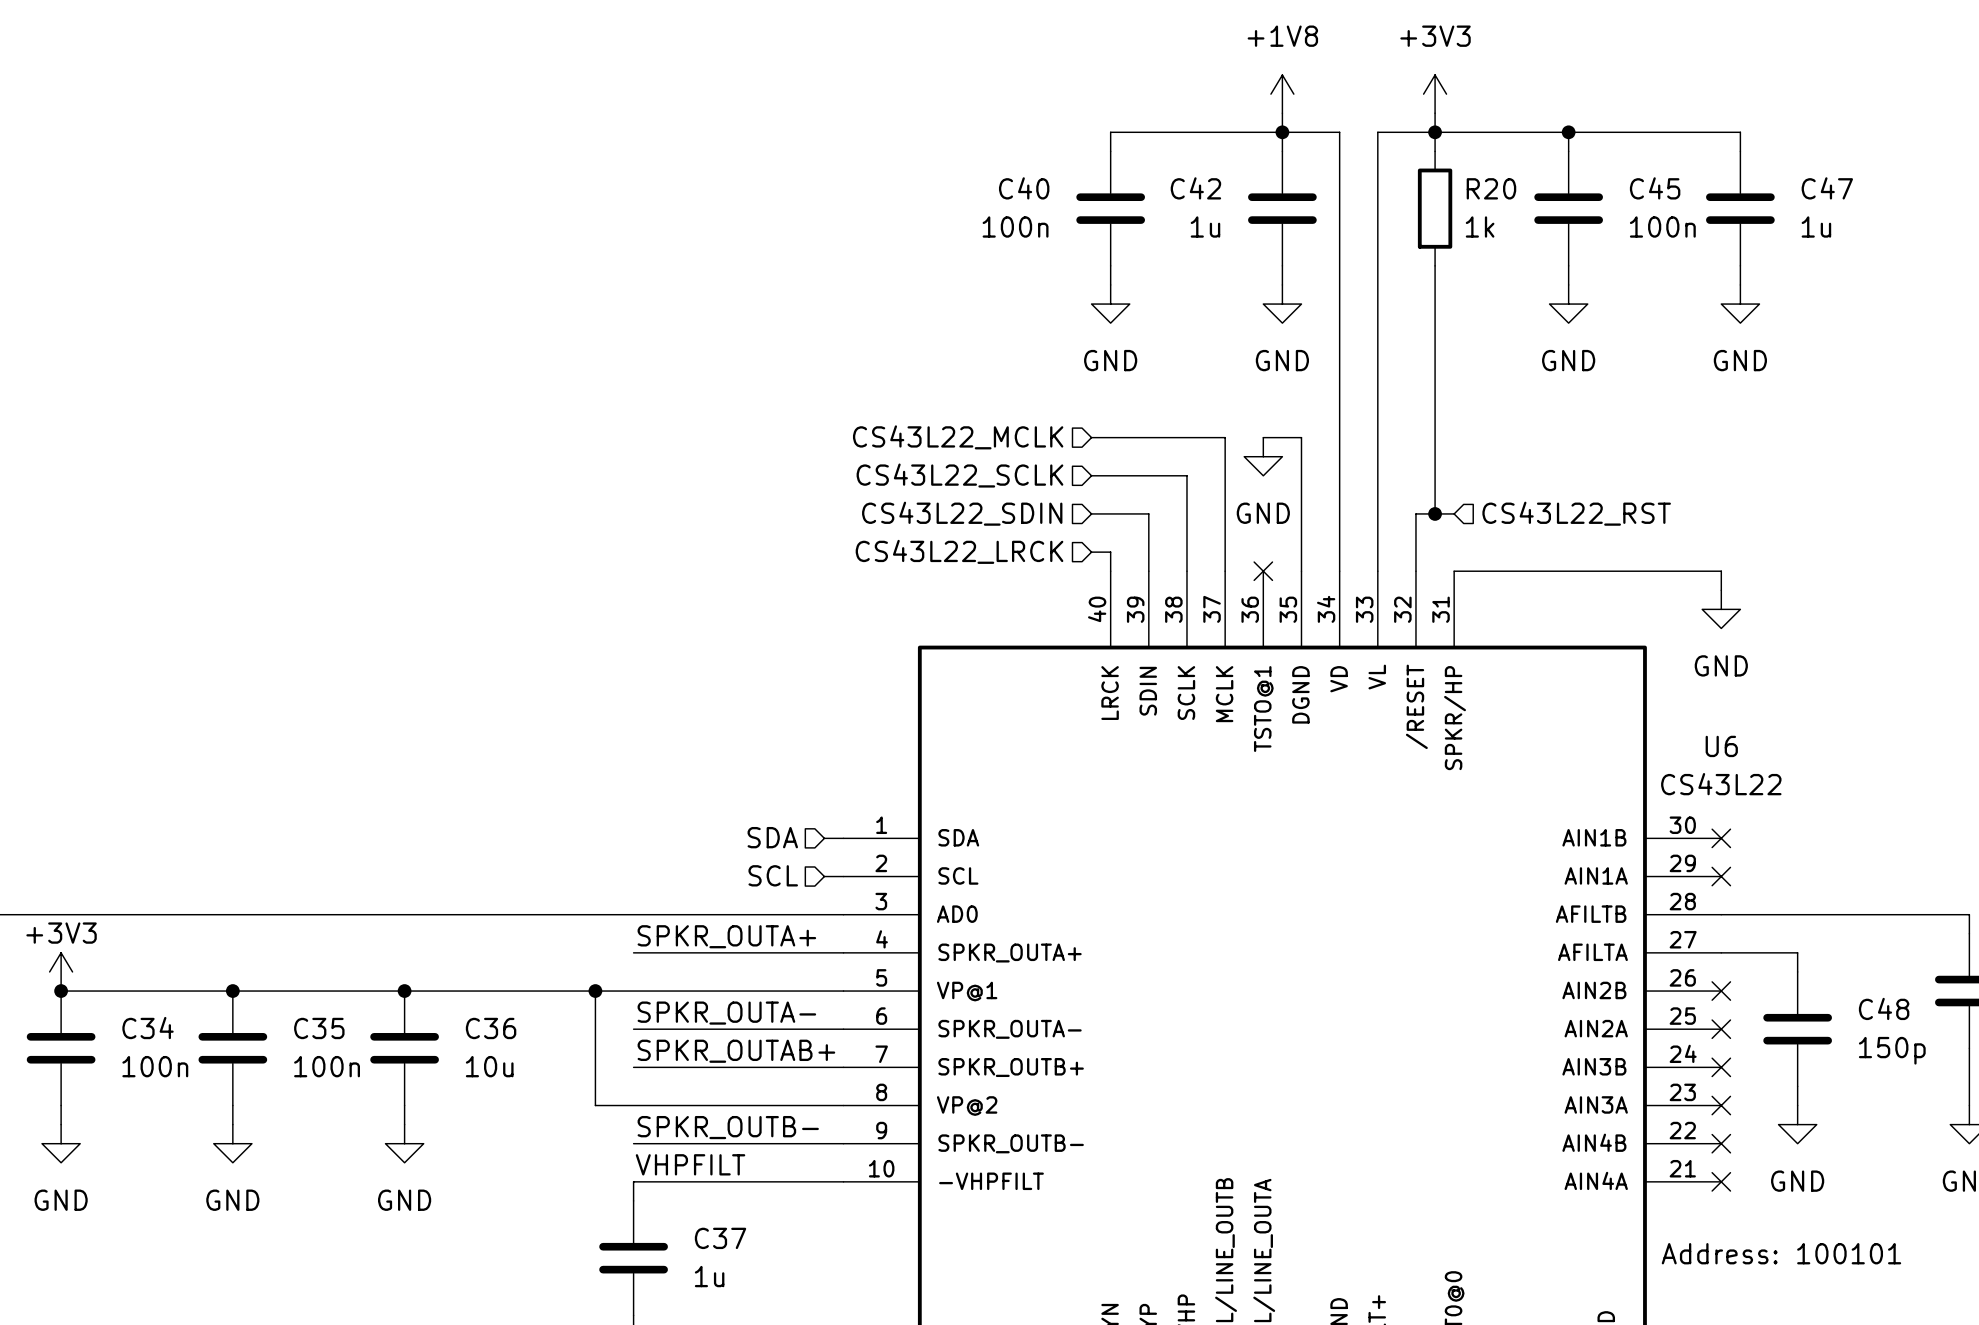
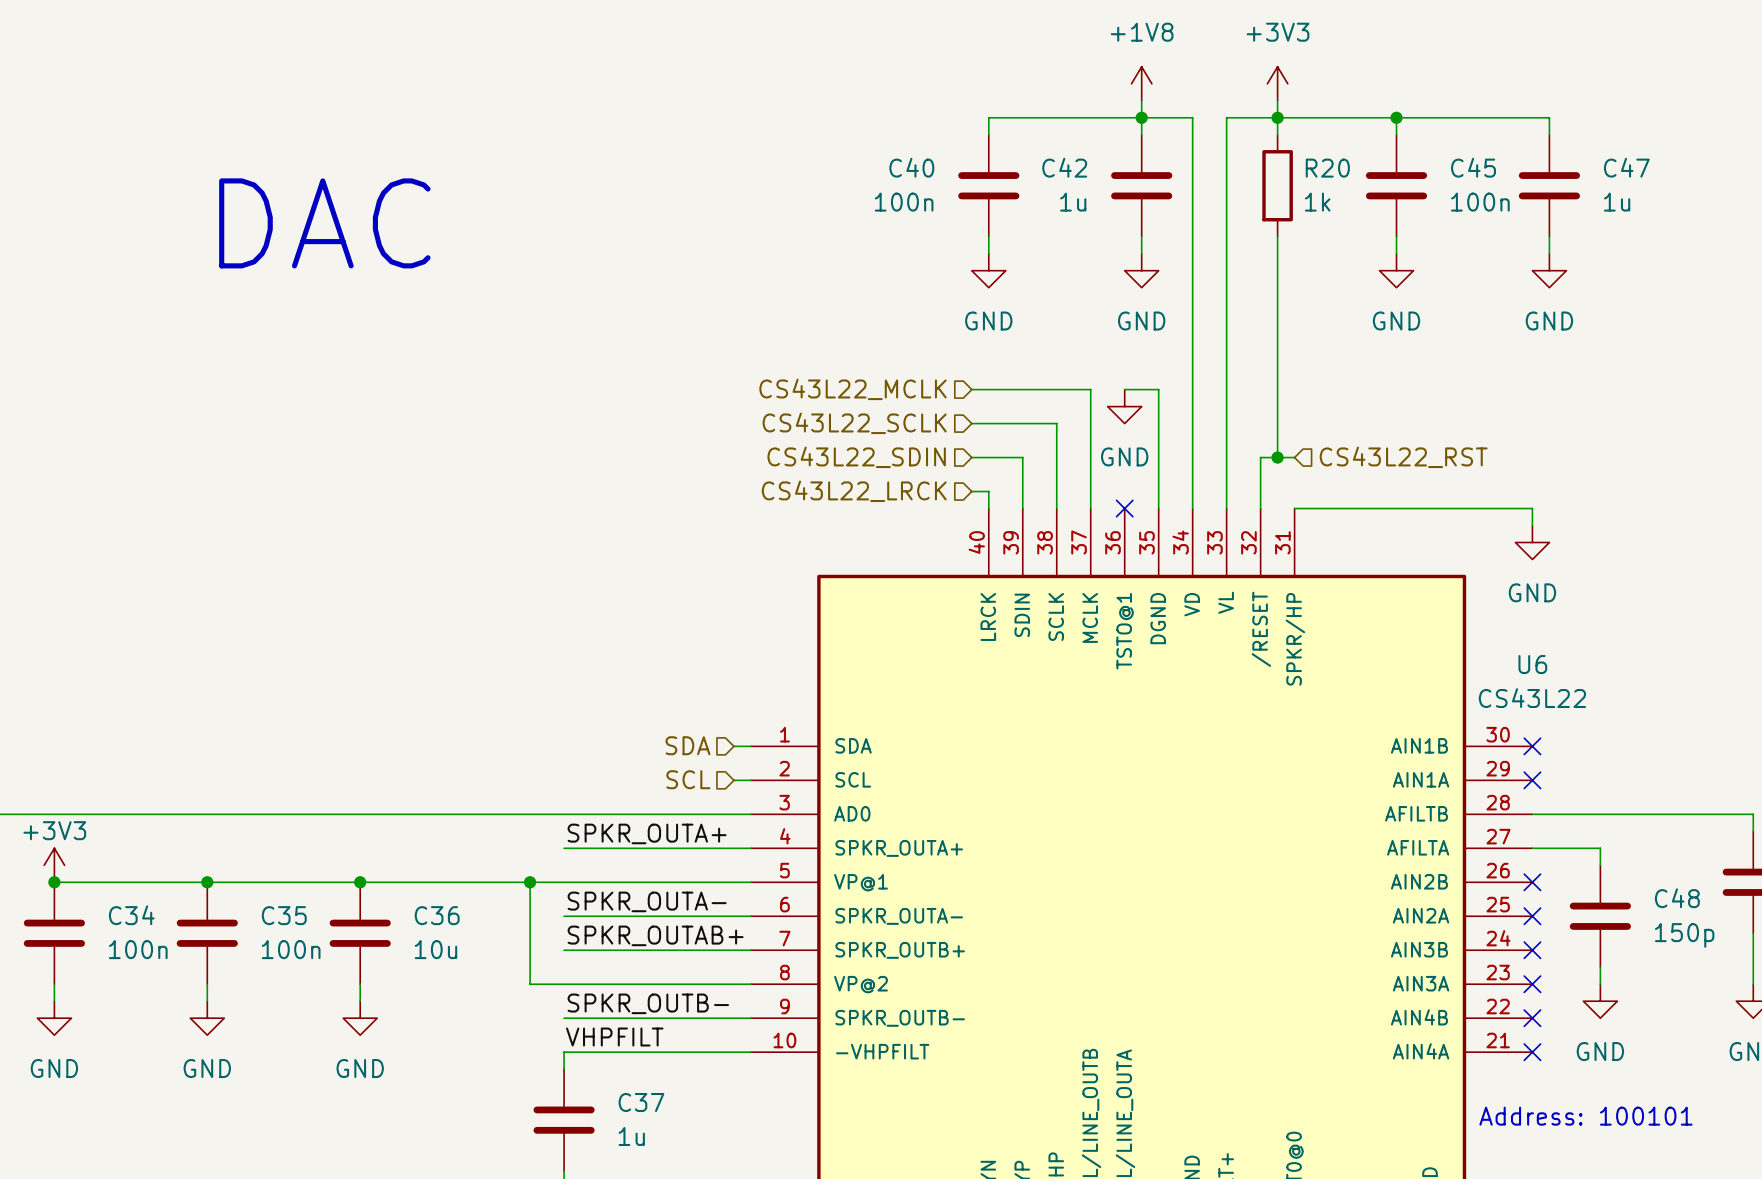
text: none -> DAC (324, 223)

